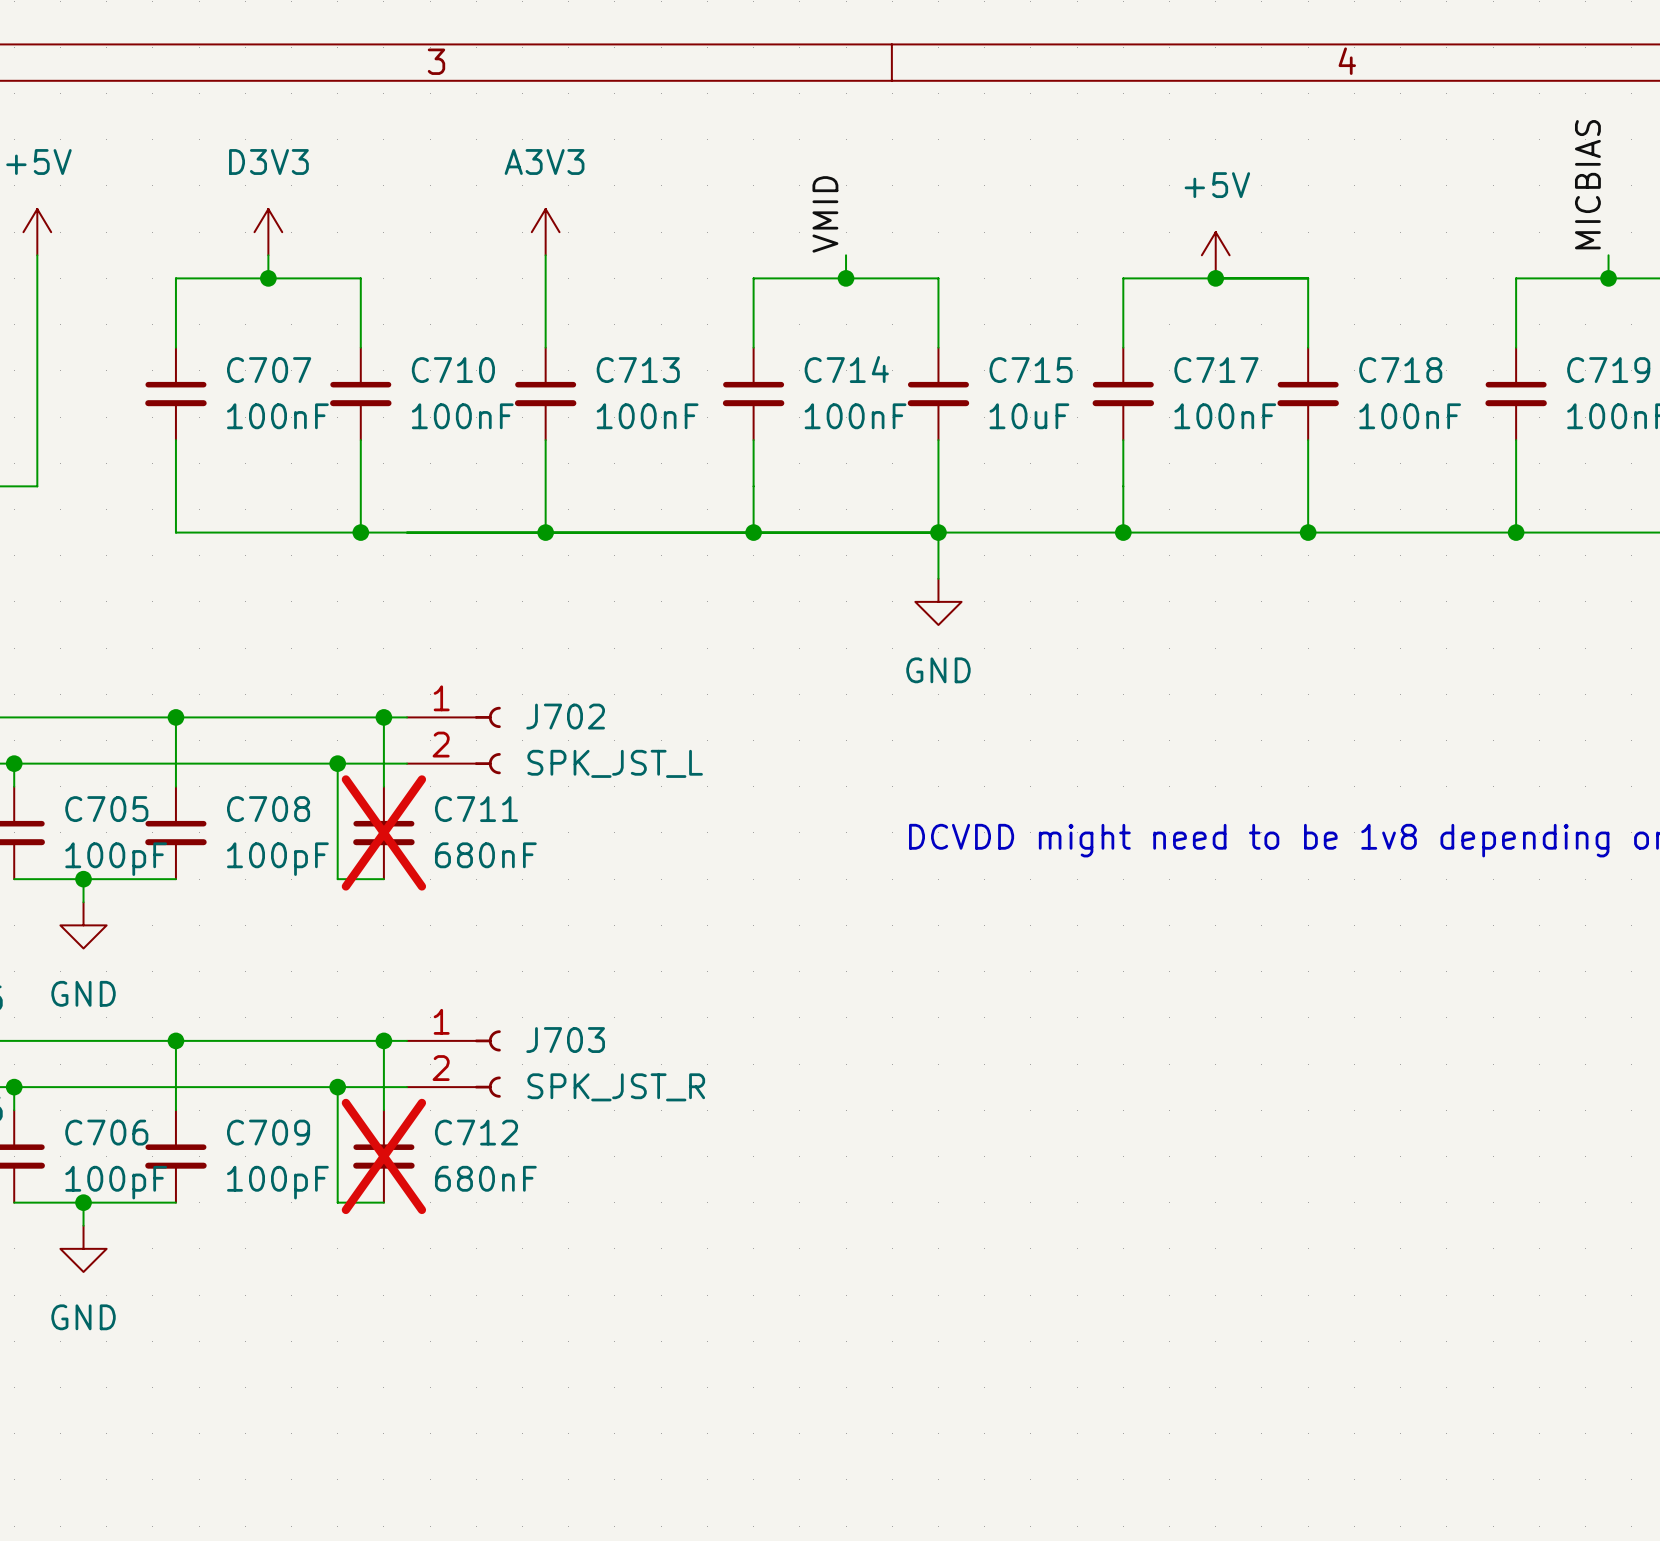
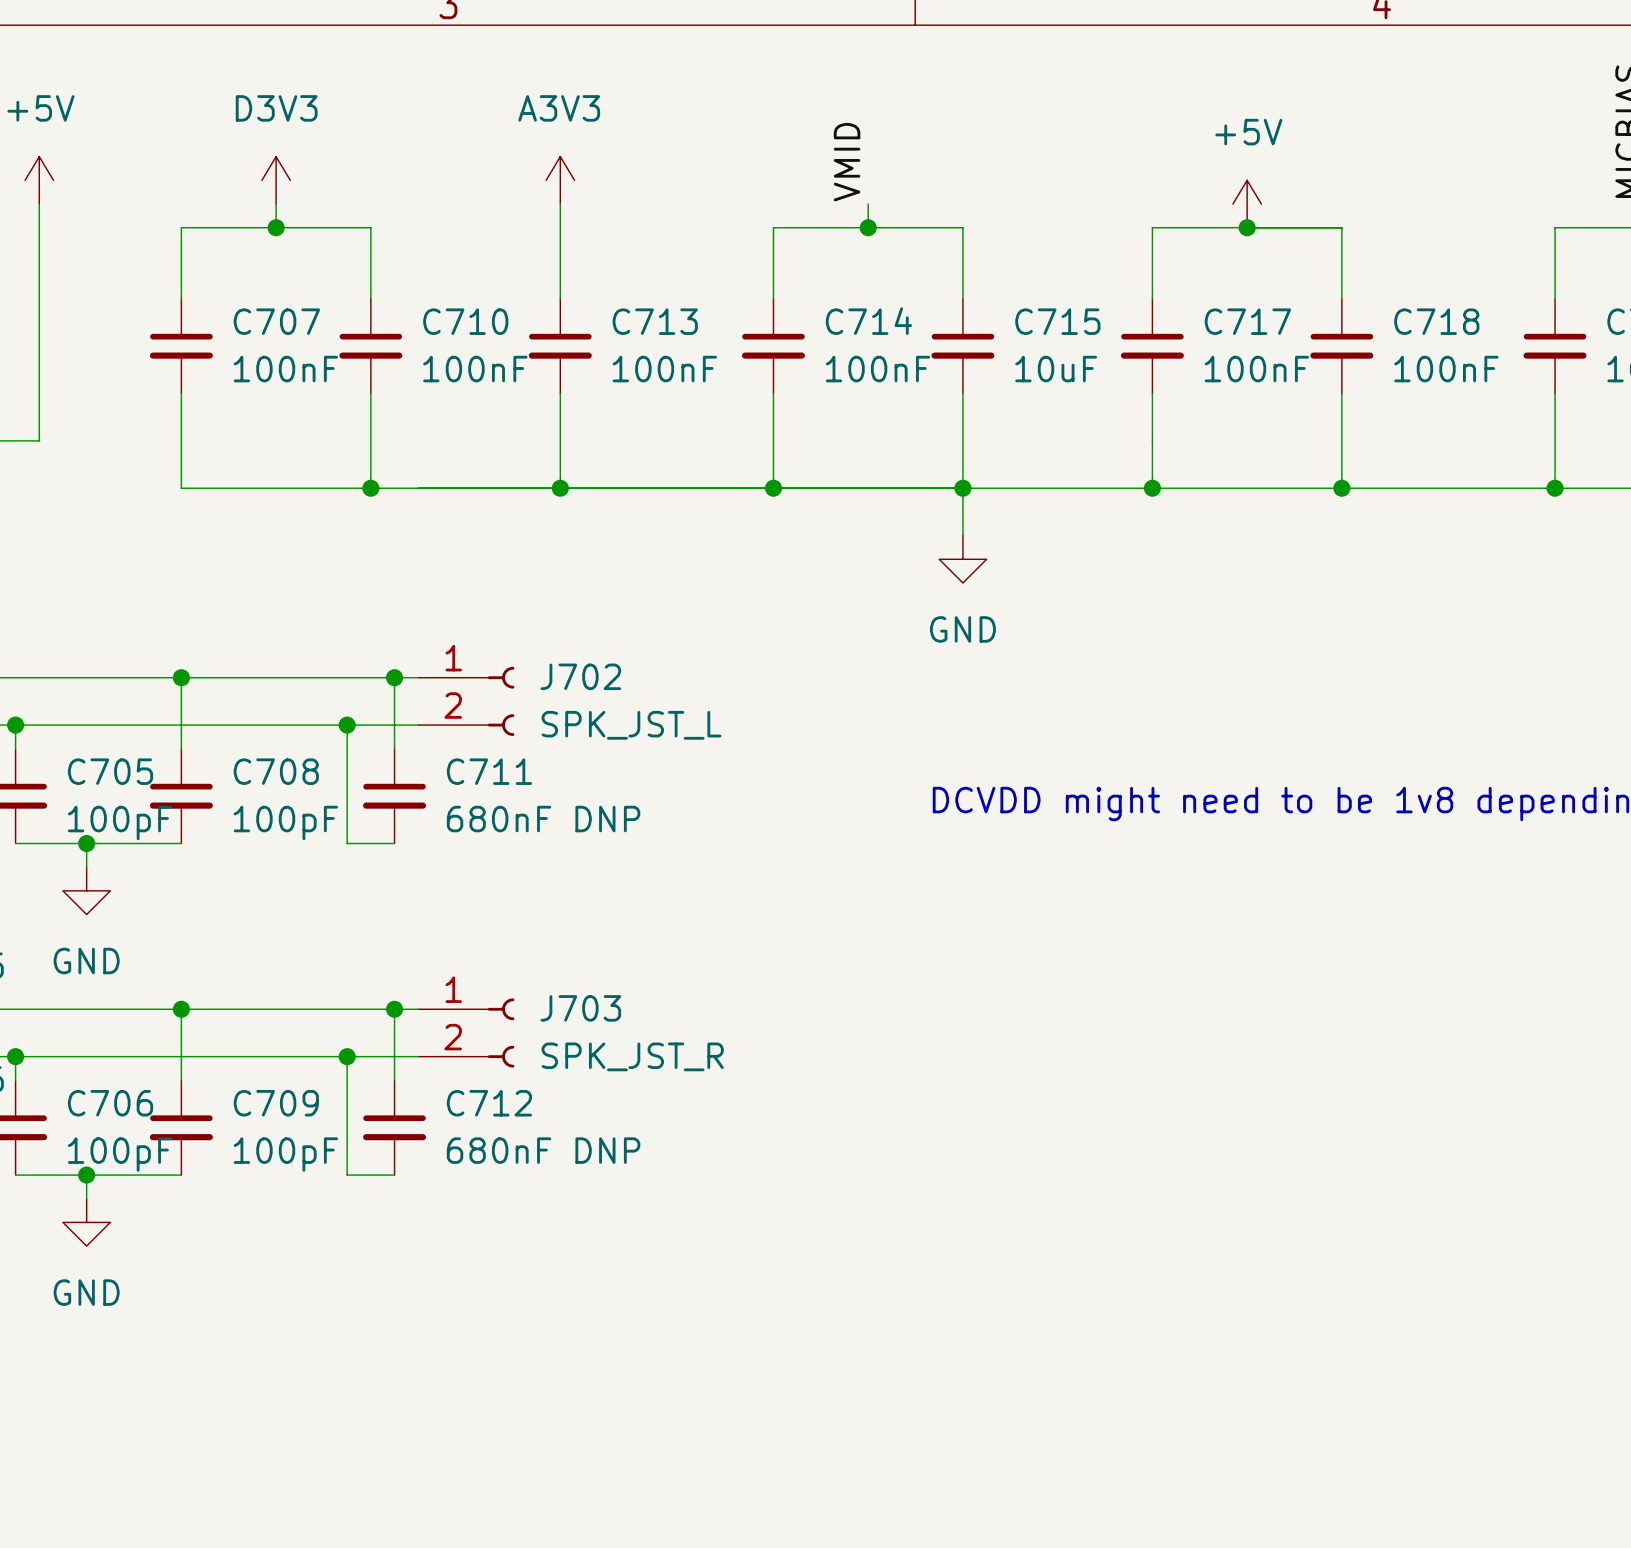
C711 do-not-place cross: (383, 832) -> none
C711 value: 680nF (485, 855) -> 680nF DNP (543, 819)
C712 do-not-place cross: (383, 1156) -> none
C712 value: 680nF (485, 1178) -> 680nF DNP (543, 1150)

